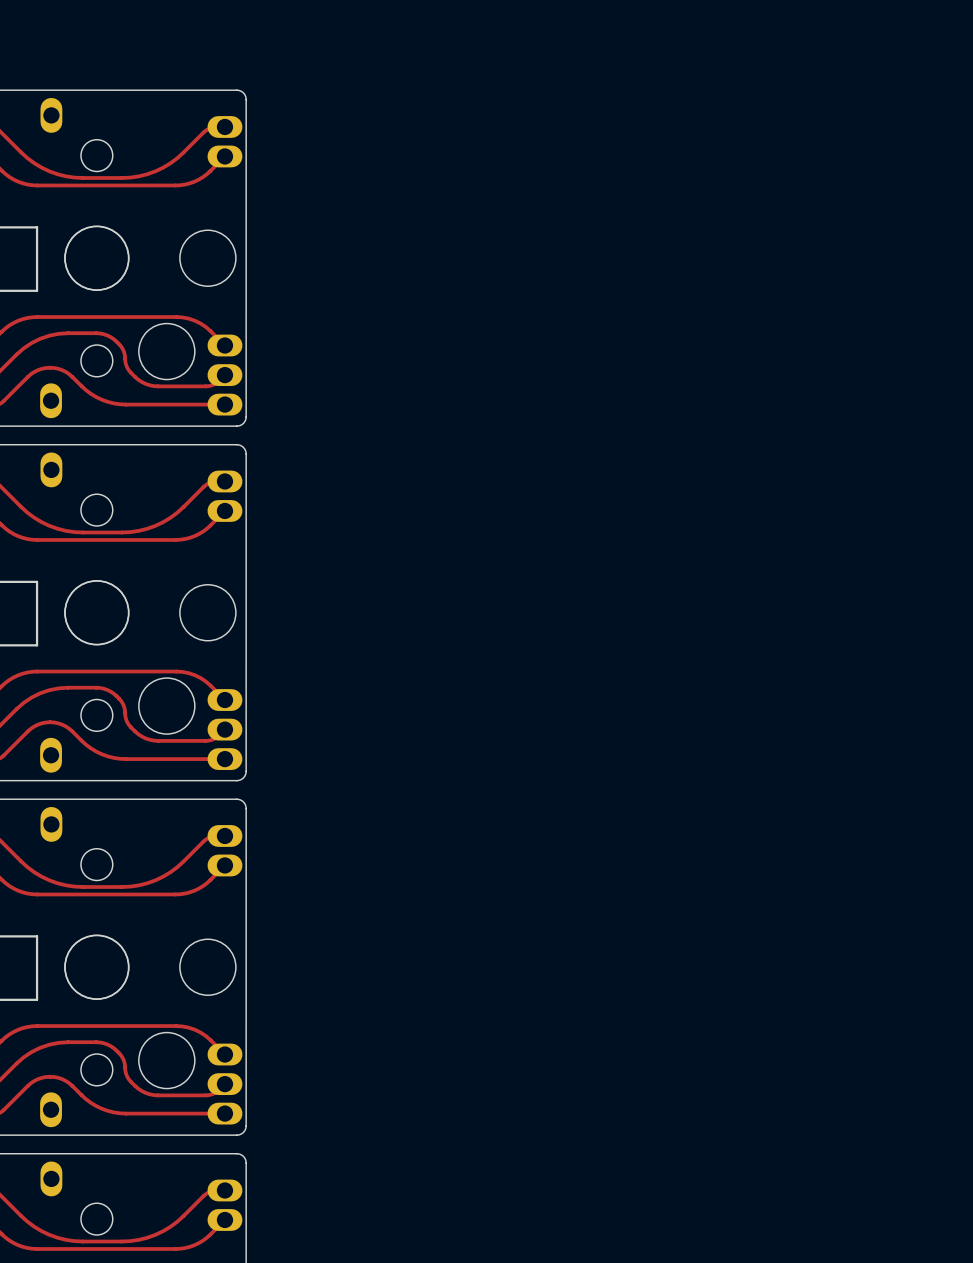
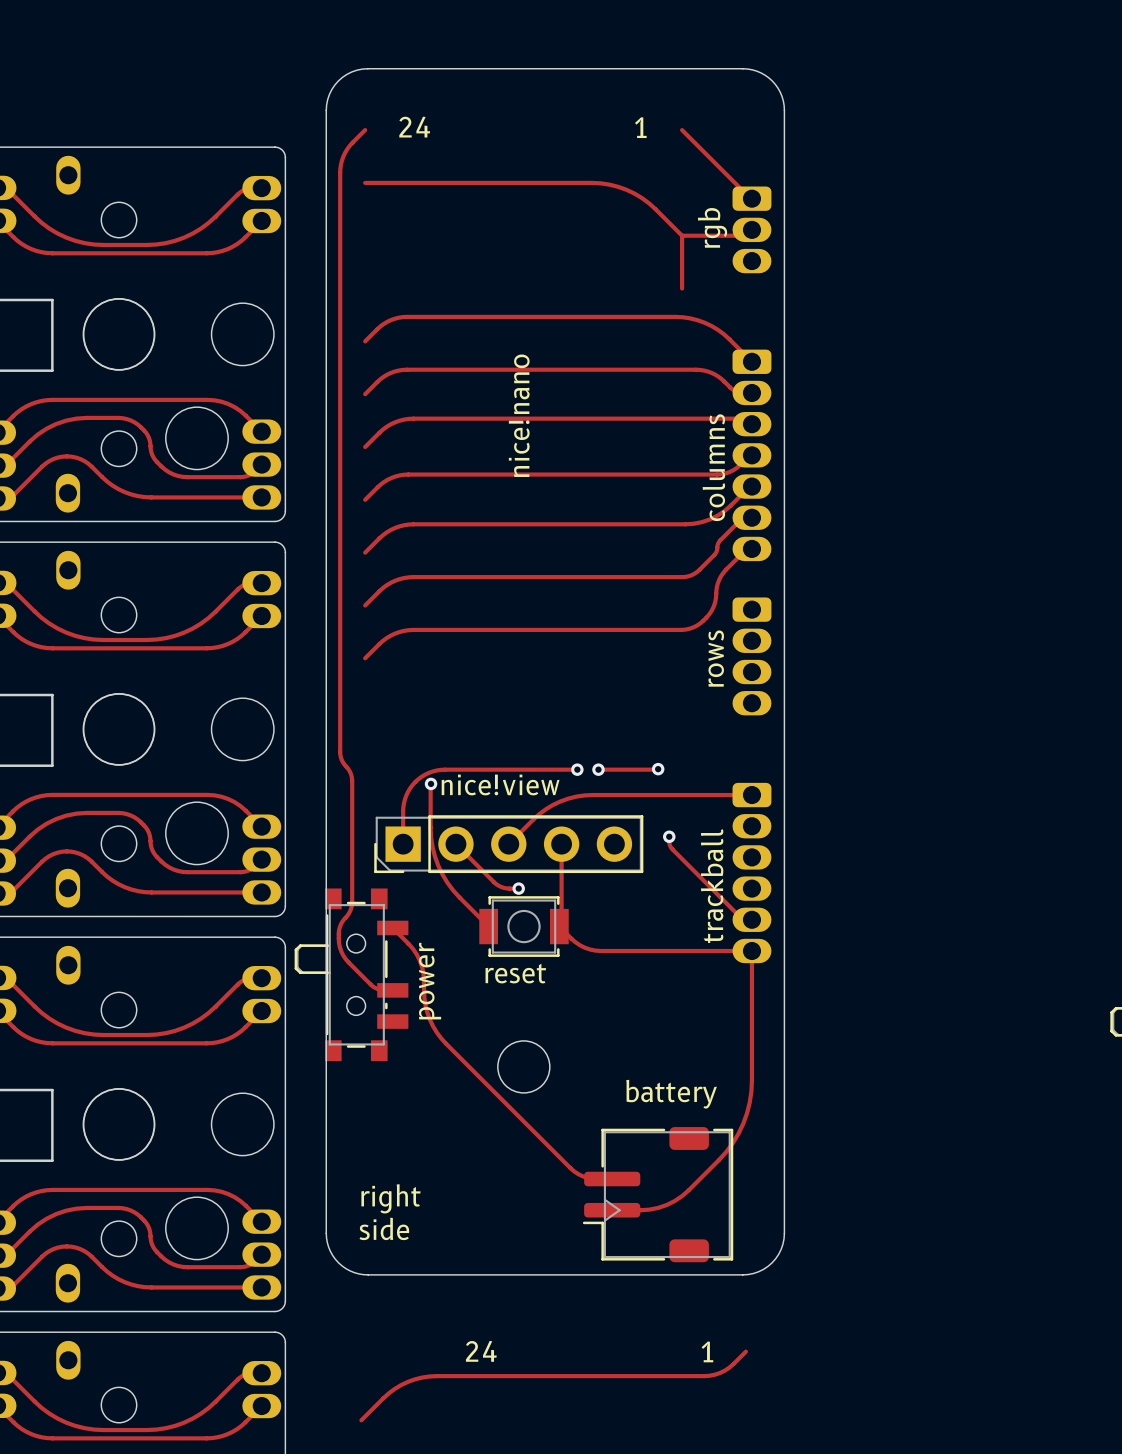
board edge: none -> (367, 68) (747, 69) (756, 71) (768, 77) (775, 84) (782, 96) (784, 110) (784, 1233) (782, 1244) (775, 1258) (768, 1266) (753, 1273) (363, 1274) (354, 1272) (342, 1265) (335, 1259) (328, 1247) (326, 1233) (326, 110) (329, 94) (338, 80) (351, 71) (367, 68)
text: none -> 24 (414, 127)
text: none -> 1 (640, 127)
track: none -> (365, 130) (345, 152) (340, 172) (340, 752) (341, 759) (352, 778) (352, 901) (349, 913) (340, 925) (338, 938) (341, 951) (345, 959) (370, 984) (379, 989) (392, 990)
track: none -> (682, 130) (751, 198)
track: none -> (365, 182) (591, 182) (609, 184) (626, 189) (642, 198) (682, 235)
text: none -> rgb (712, 227)
track: none -> (751, 229) (743, 235) (682, 235)
part: none -> (751, 229)
track: none -> (682, 235) (682, 288)
track: none -> (365, 341) (383, 323) (402, 317) (682, 317) (704, 322) (717, 329) (751, 361)
track: none -> (751, 392) (736, 391) (714, 374) (699, 369) (406, 369) (387, 374) (365, 394)
text: none -> nice!nano (519, 415)
track: none -> (751, 424) (742, 418) (408, 418) (386, 426) (365, 447)
track: none -> (751, 455) (733, 470) (717, 474) (404, 474) (384, 481) (365, 499)
part: none -> (751, 455)
text: none -> columns (713, 467)
track: none -> (751, 486) (717, 515) (693, 523) (408, 524) (386, 532) (365, 552)
track: none -> (751, 517) (739, 520) (719, 541) (714, 555) (697, 571) (686, 576) (408, 577) (386, 585) (365, 605)
track: none -> (751, 548) (745, 550) (724, 572) (717, 583) (715, 602) (711, 610) (701, 622) (690, 628) (408, 630) (386, 638) (365, 658)
part: none -> (751, 656)
text: none -> rows (716, 658)
track: none -> (577, 769) (444, 769) (428, 772) (415, 781) (406, 795) (403, 807) (403, 844)
via: none -> (577, 769)
via: none -> (598, 769)
track: none -> (657, 769) (598, 769)
via: none -> (658, 769)
track: none -> (430, 784) (431, 837) (438, 865) (453, 890) (488, 926)
via: none -> (431, 783)
text: none -> nice!view (500, 785)
track: none -> (751, 795) (576, 796) (560, 801) (546, 809) (508, 844)
track: none -> (669, 836) (669, 844) (672, 849) (739, 916) (751, 919)
via: none -> (669, 836)
track: none -> (455, 844) (496, 884) (503, 887) (518, 888)
part: none -> (508, 844)
track: none -> (561, 844) (560, 926) (580, 945) (601, 950) (751, 950) (751, 1091) (747, 1113) (738, 1133) (718, 1160) (688, 1190) (674, 1201) (649, 1209) (612, 1210)
part: none -> (751, 873)
text: none -> trackball (712, 886)
via: none -> (518, 888)
part: none -> (524, 926)
track: none -> (392, 927) (413, 948) (419, 960) (423, 974) (427, 1012) (441, 1038) (574, 1171) (587, 1177) (612, 1179)
text: none -> reset (515, 973)
part: none -> (351, 974)
text: none -> power (430, 981)
round board edge: none -> [497, 1040, 551, 1094]
text: none -> battery (671, 1094)
part: none -> (658, 1194)
text: none -> right (390, 1198)
text: none -> side (384, 1228)
text: none -> 24 (481, 1351)
text: none -> 1 (707, 1351)
track: none -> (745, 1351) (725, 1370) (709, 1375) (422, 1377) (394, 1388) (361, 1420)

